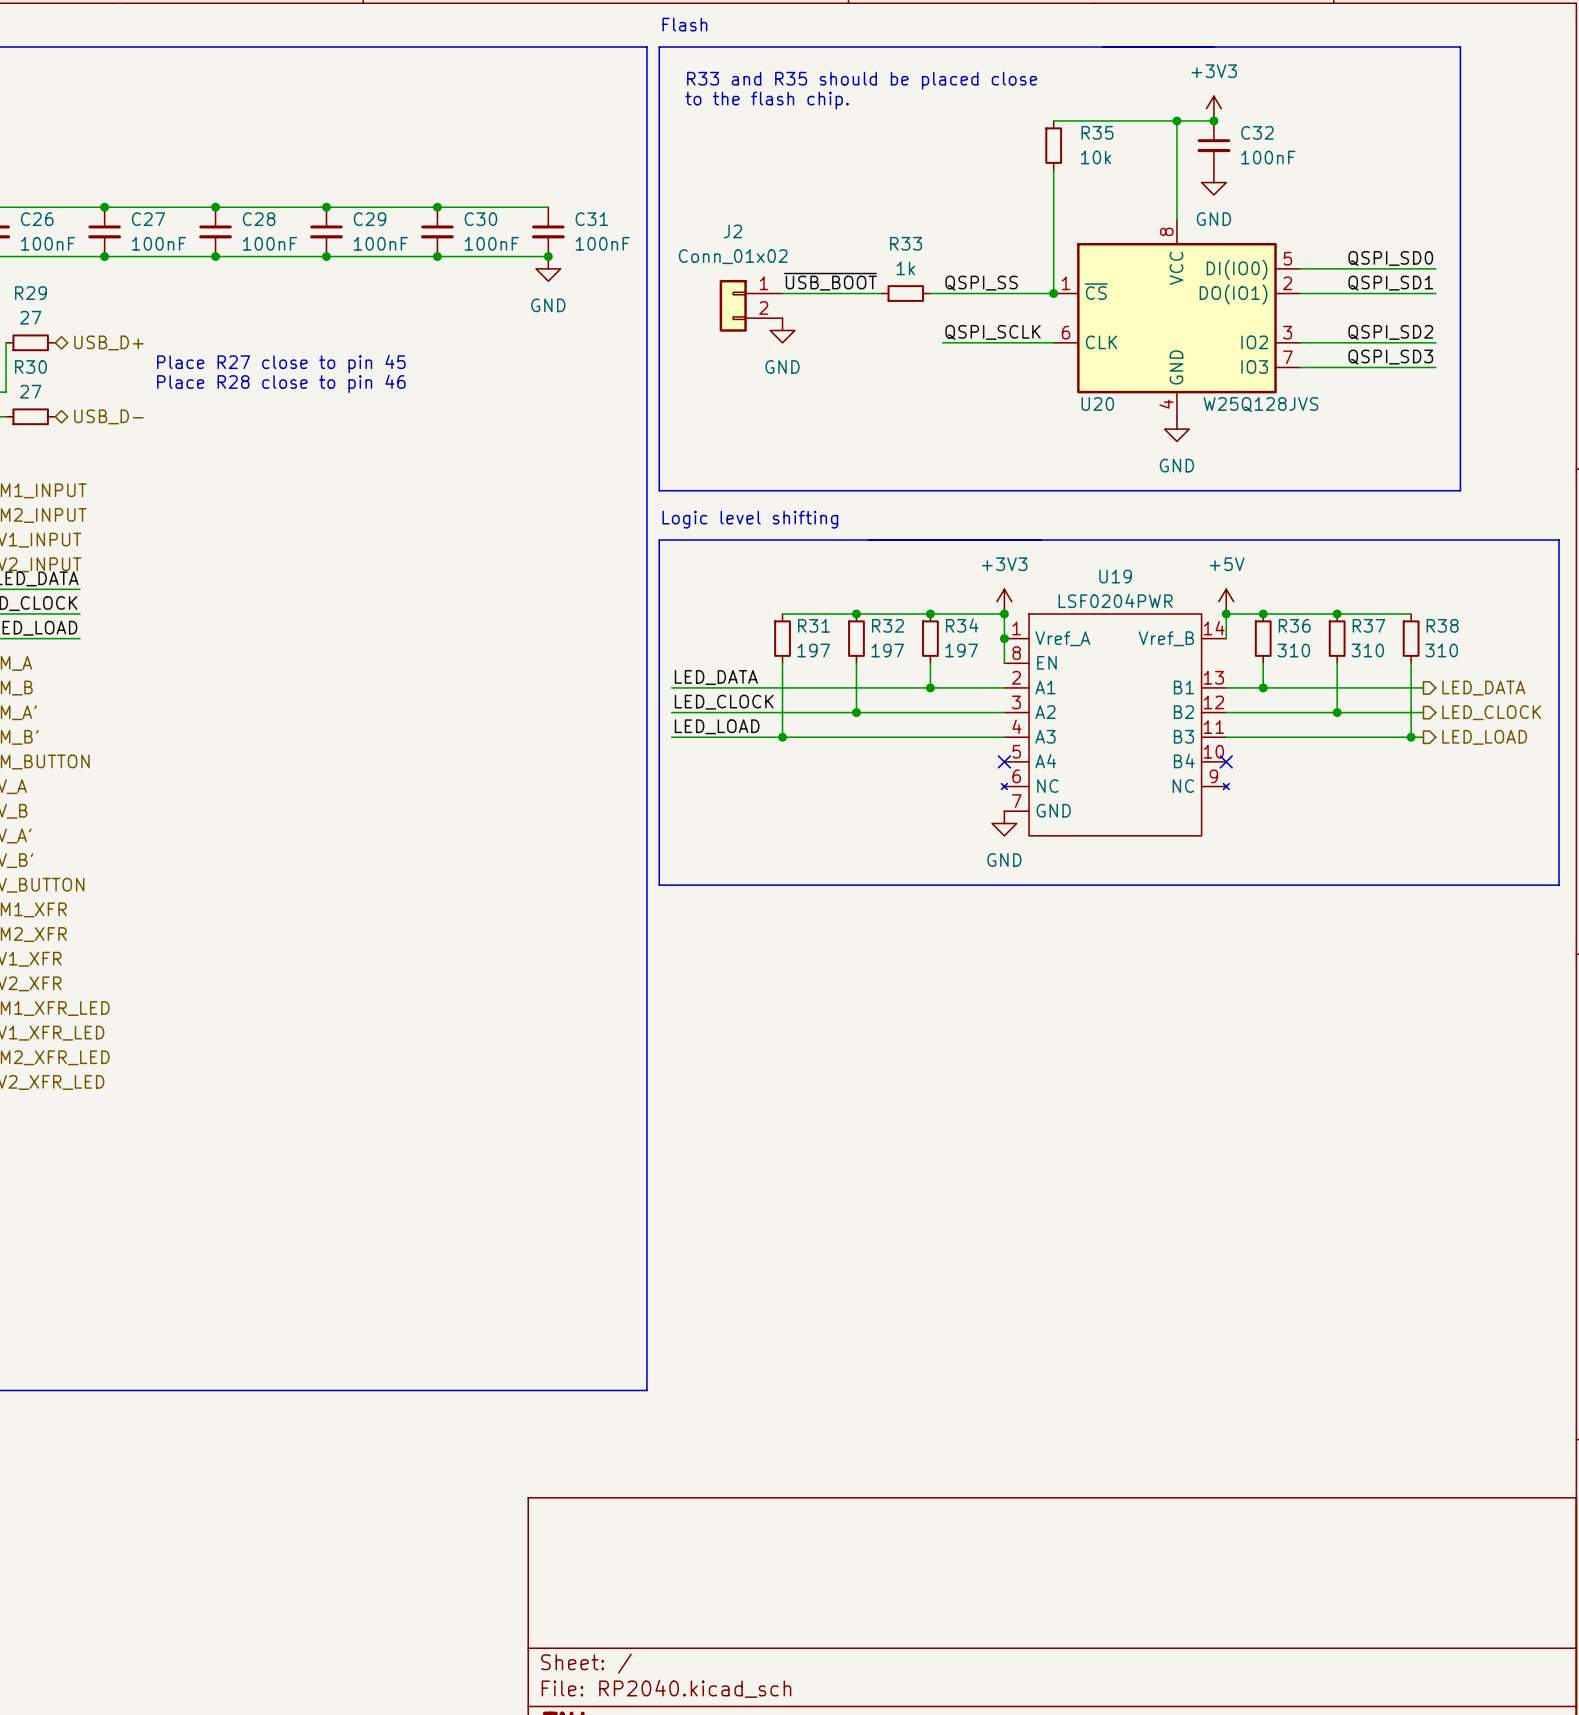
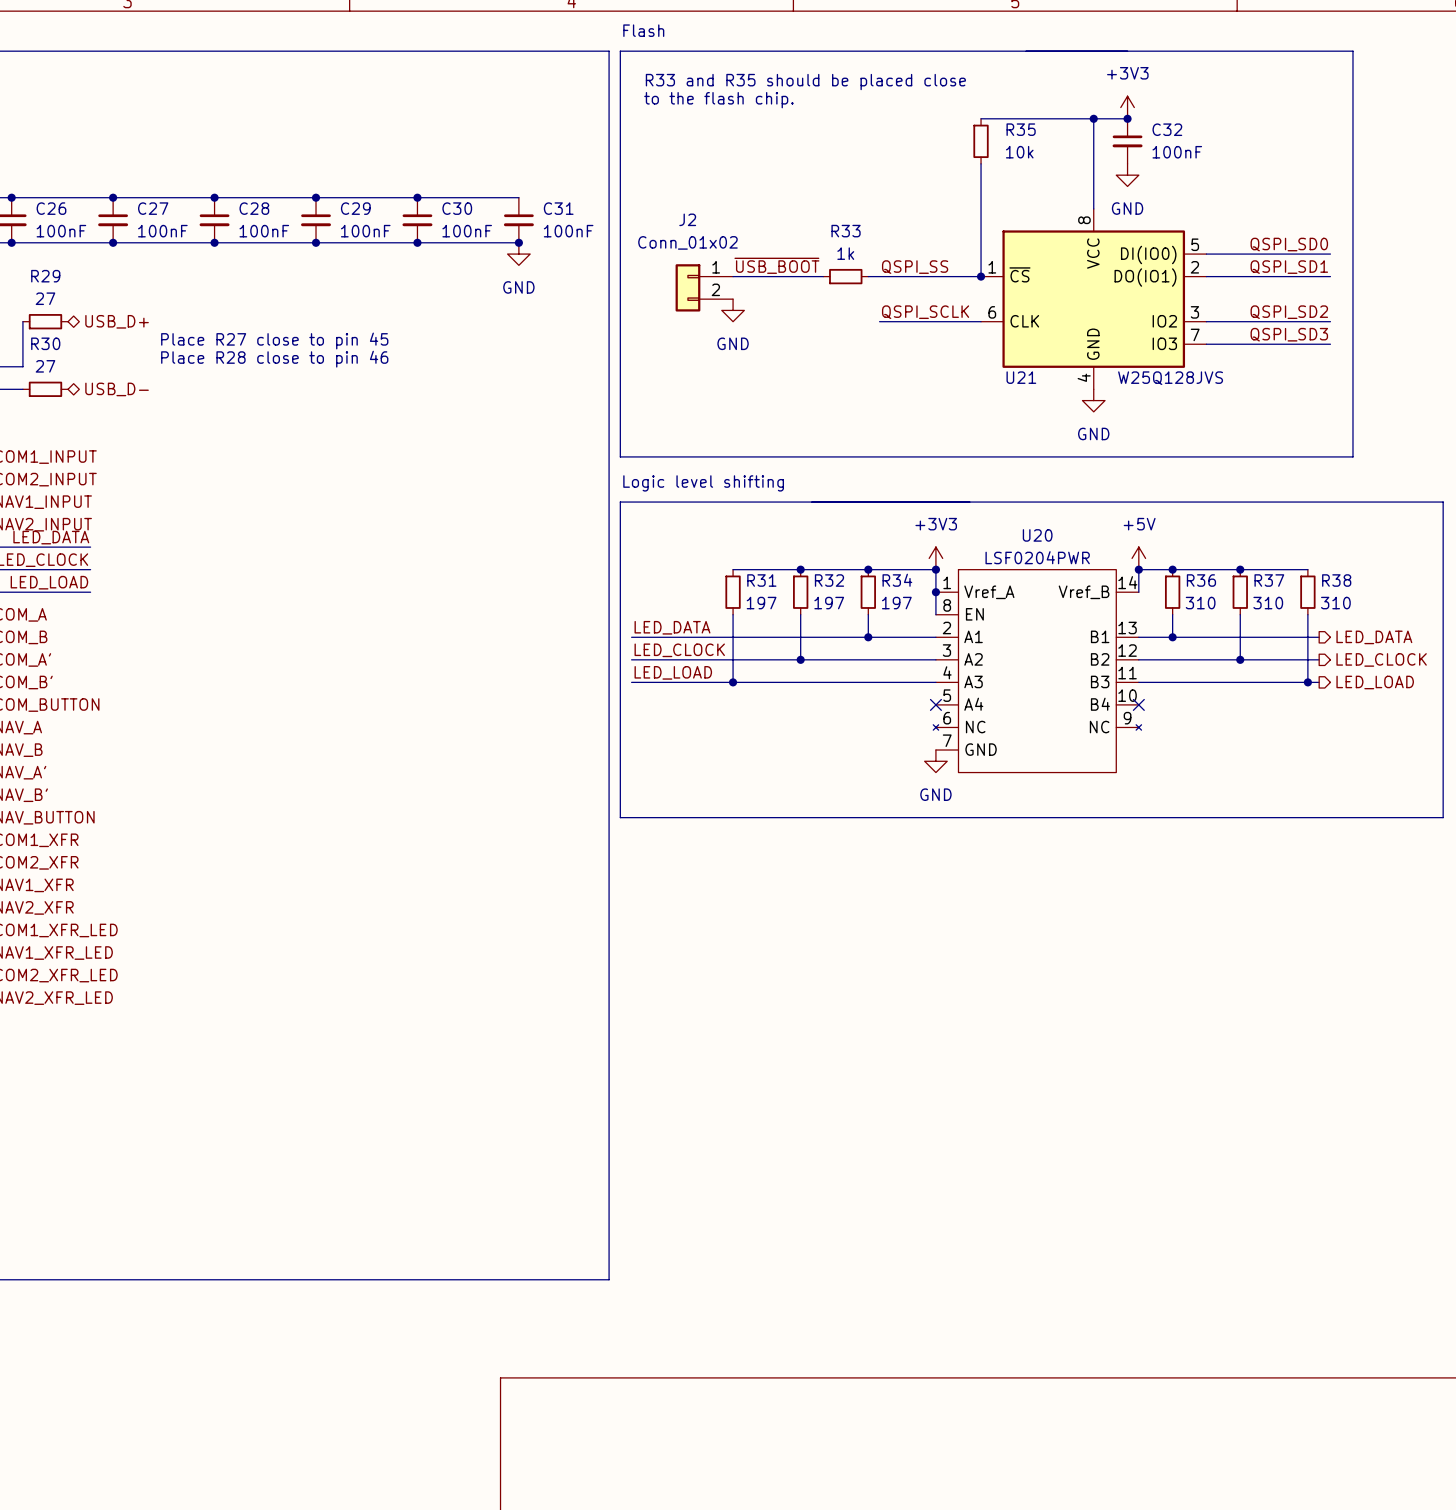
U20 name: U20 (1097, 403) -> U21 (1021, 377)
U19 name: U19 (1115, 576) -> U20 (1037, 535)

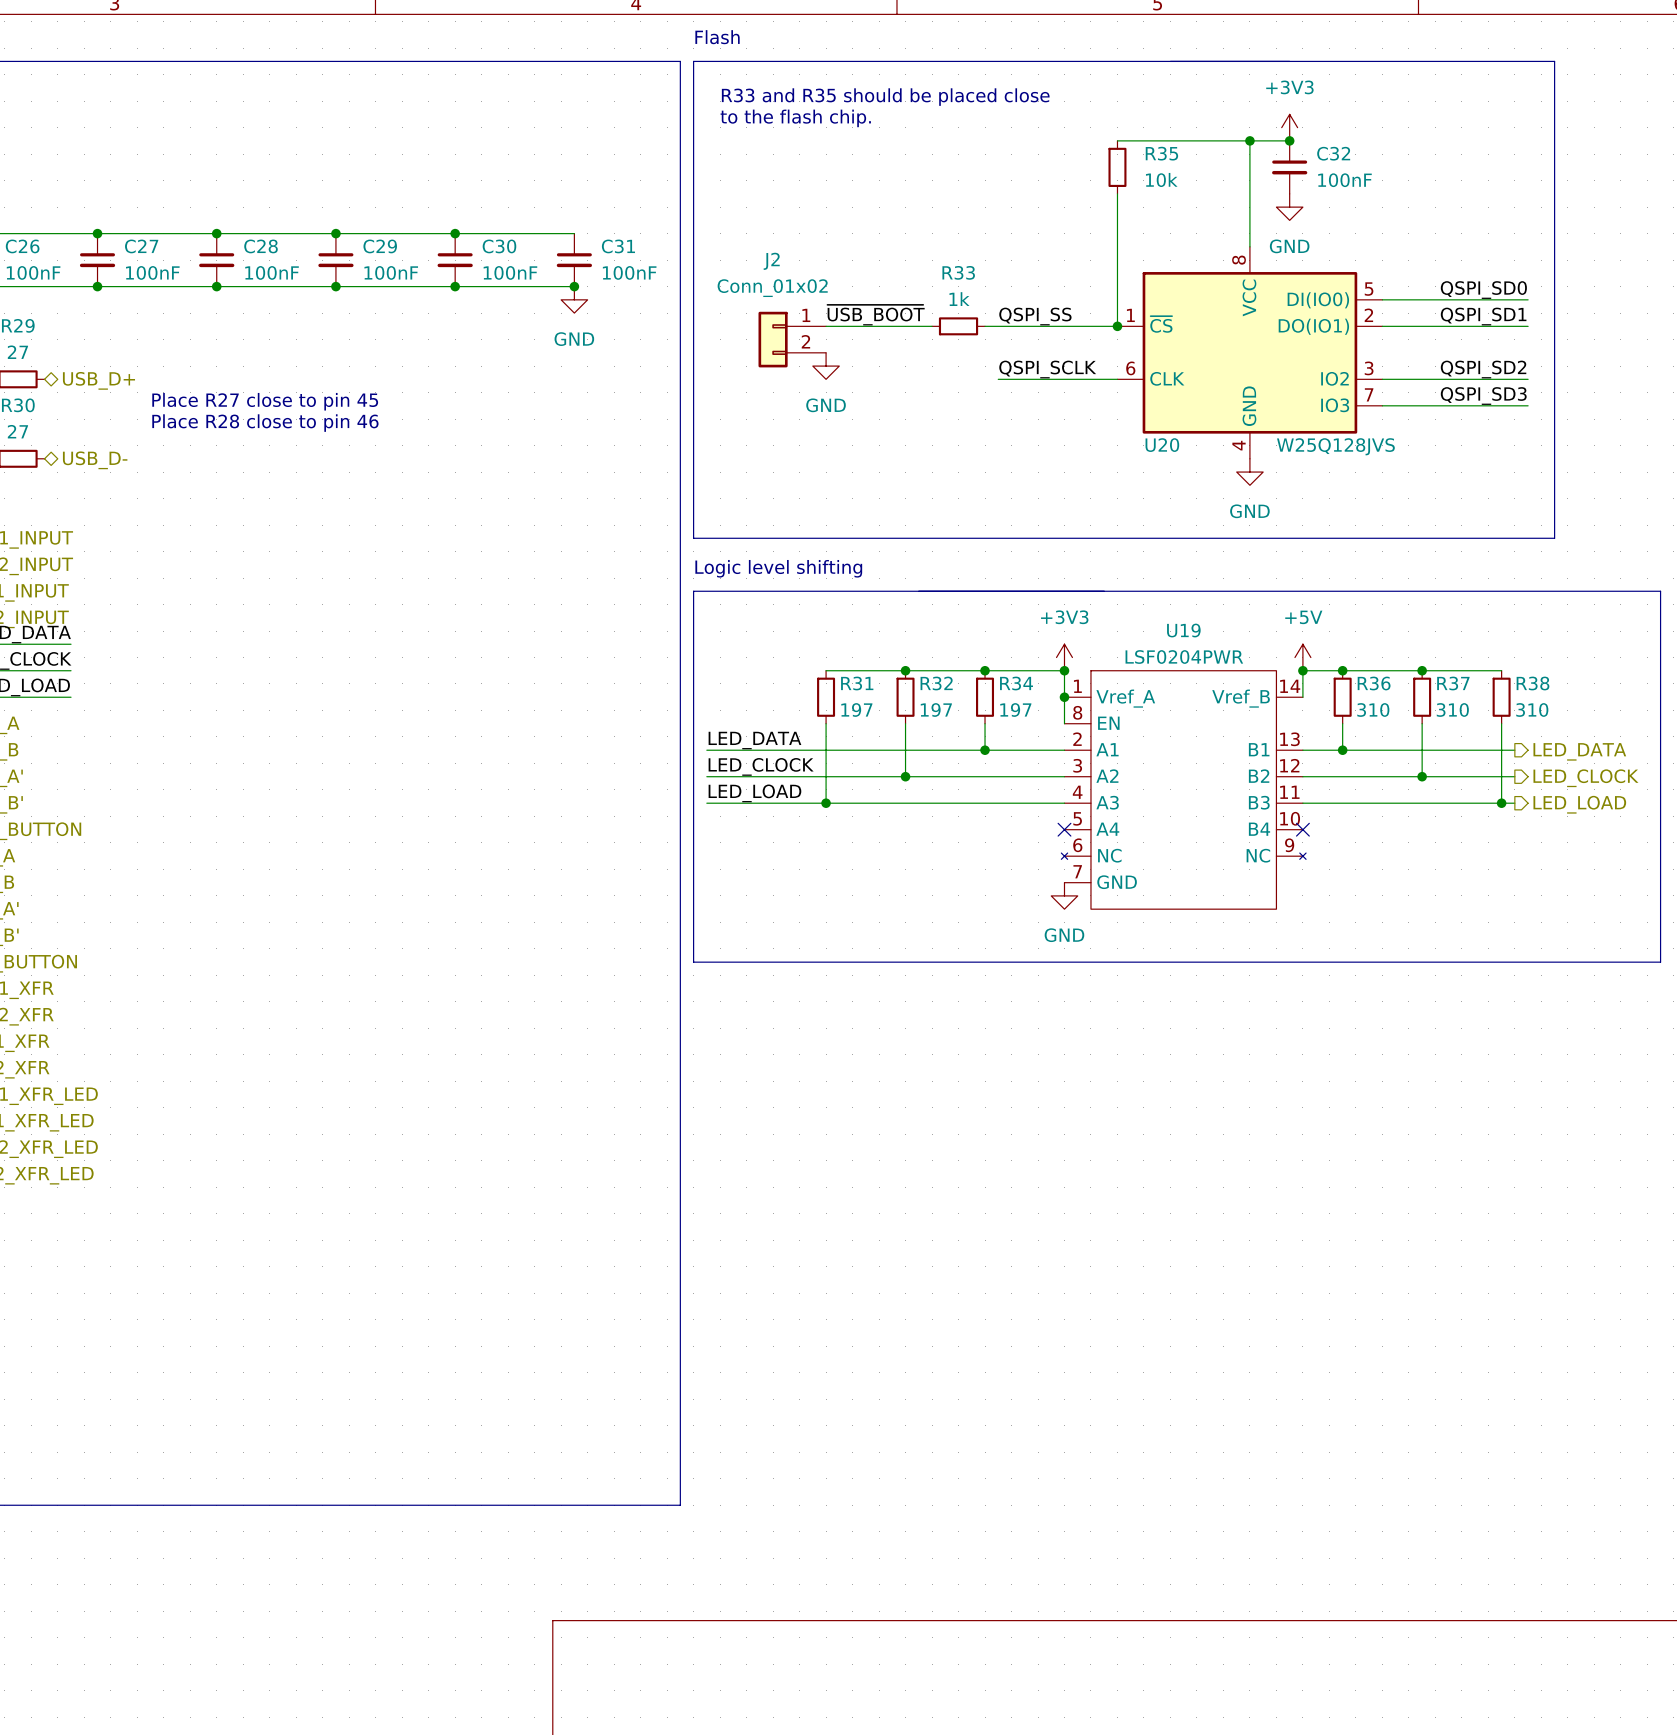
U21 name: U21 (1021, 377) -> U20 (1162, 445)
U20 name: U20 (1037, 535) -> U19 (1183, 630)

